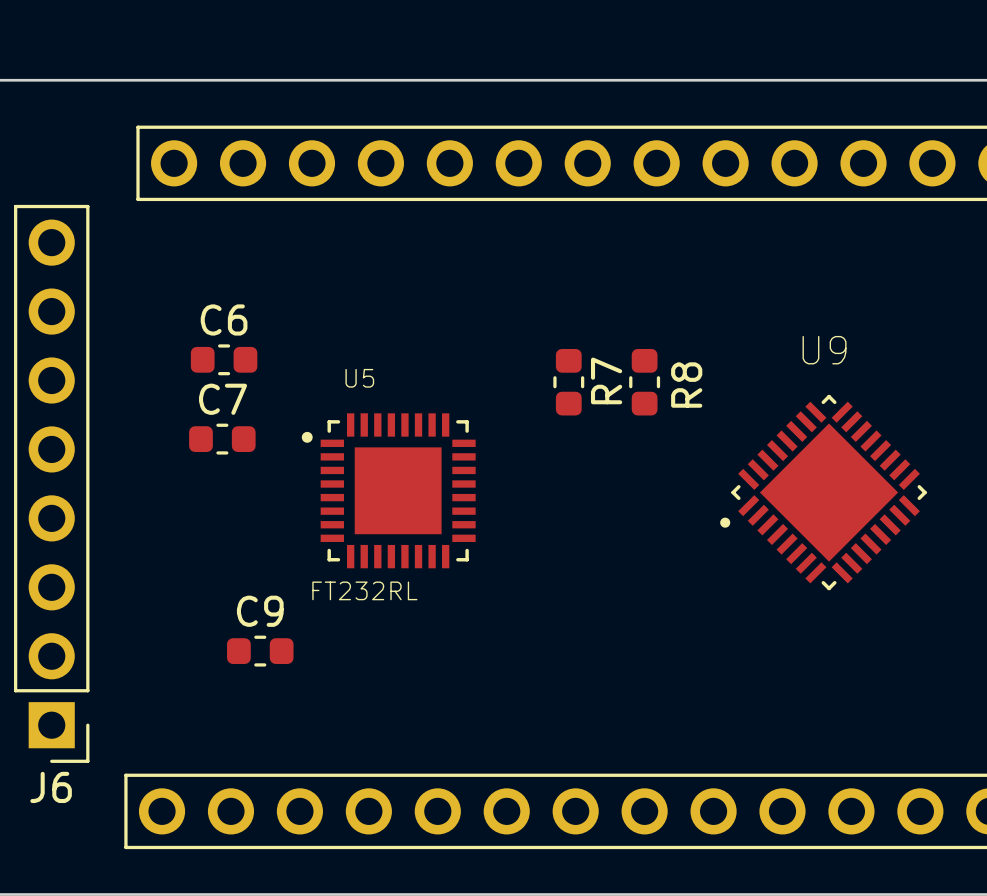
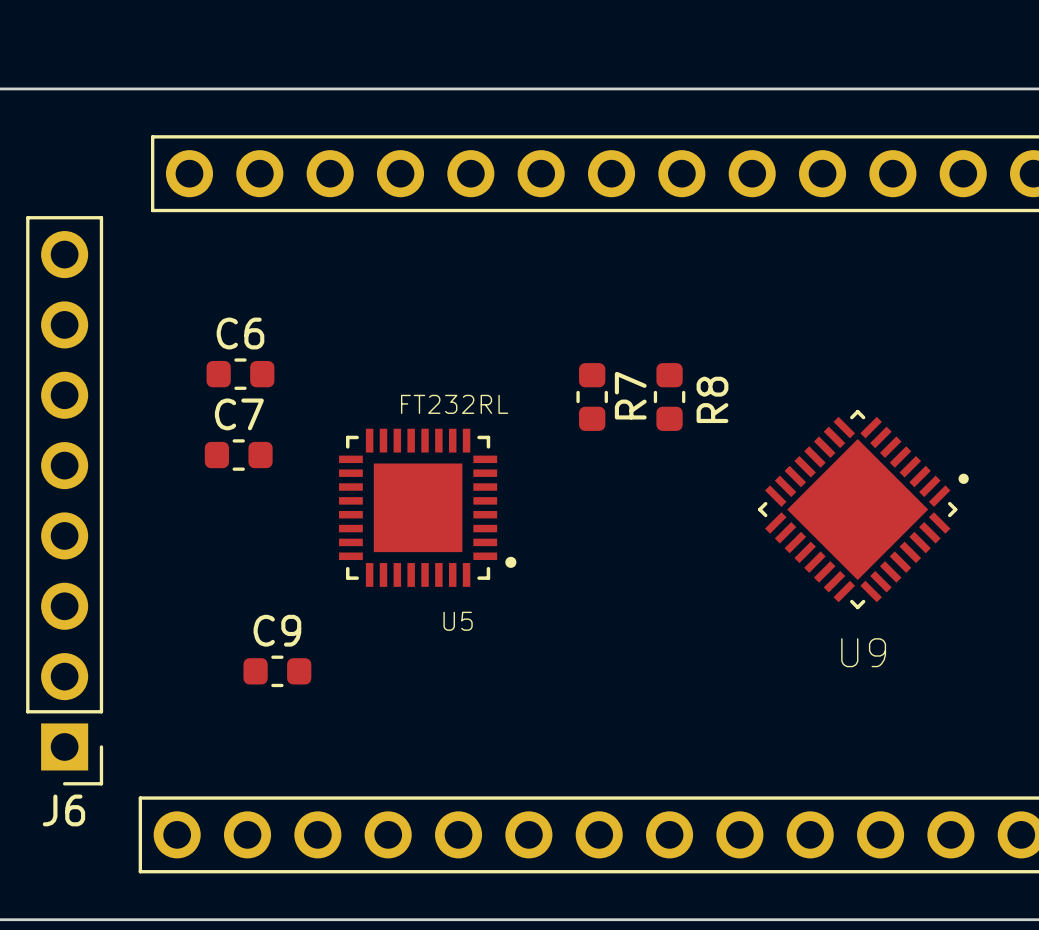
U5 rotation: 0° (388, 490) -> 180° (427, 507)
U9 rotation: 0° (823, 492) -> 180° (863, 509)

